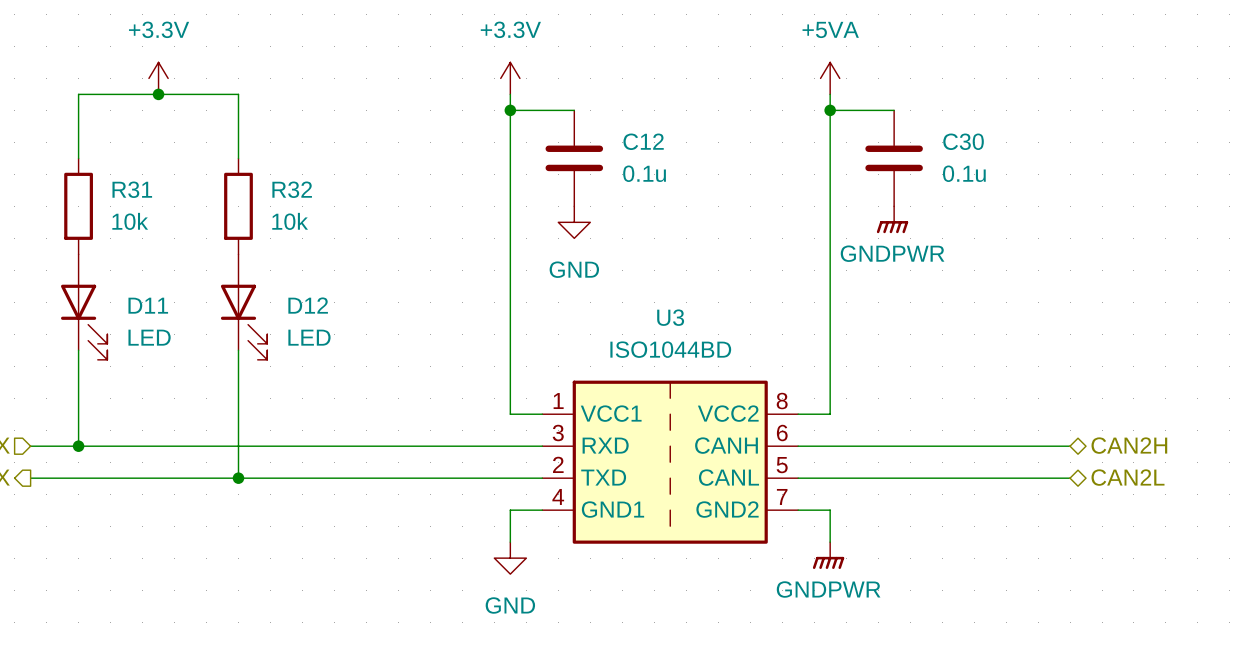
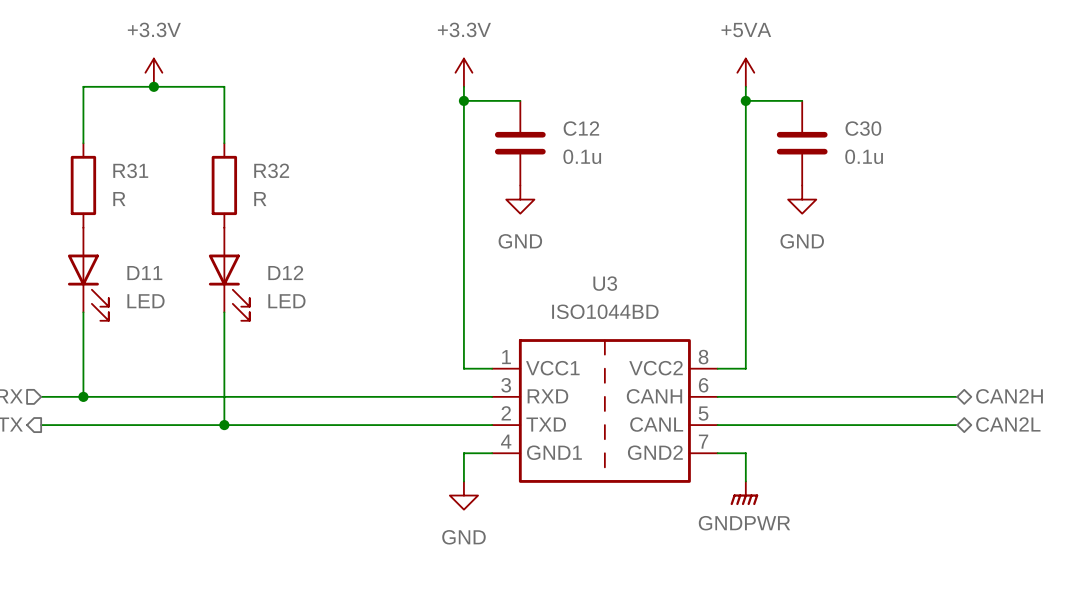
power symbol: GNDPWR (892, 219) -> GND (802, 199)
R31 value: 10k (130, 221) -> R (119, 199)
R32 value: 10k (290, 221) -> R (260, 199)

